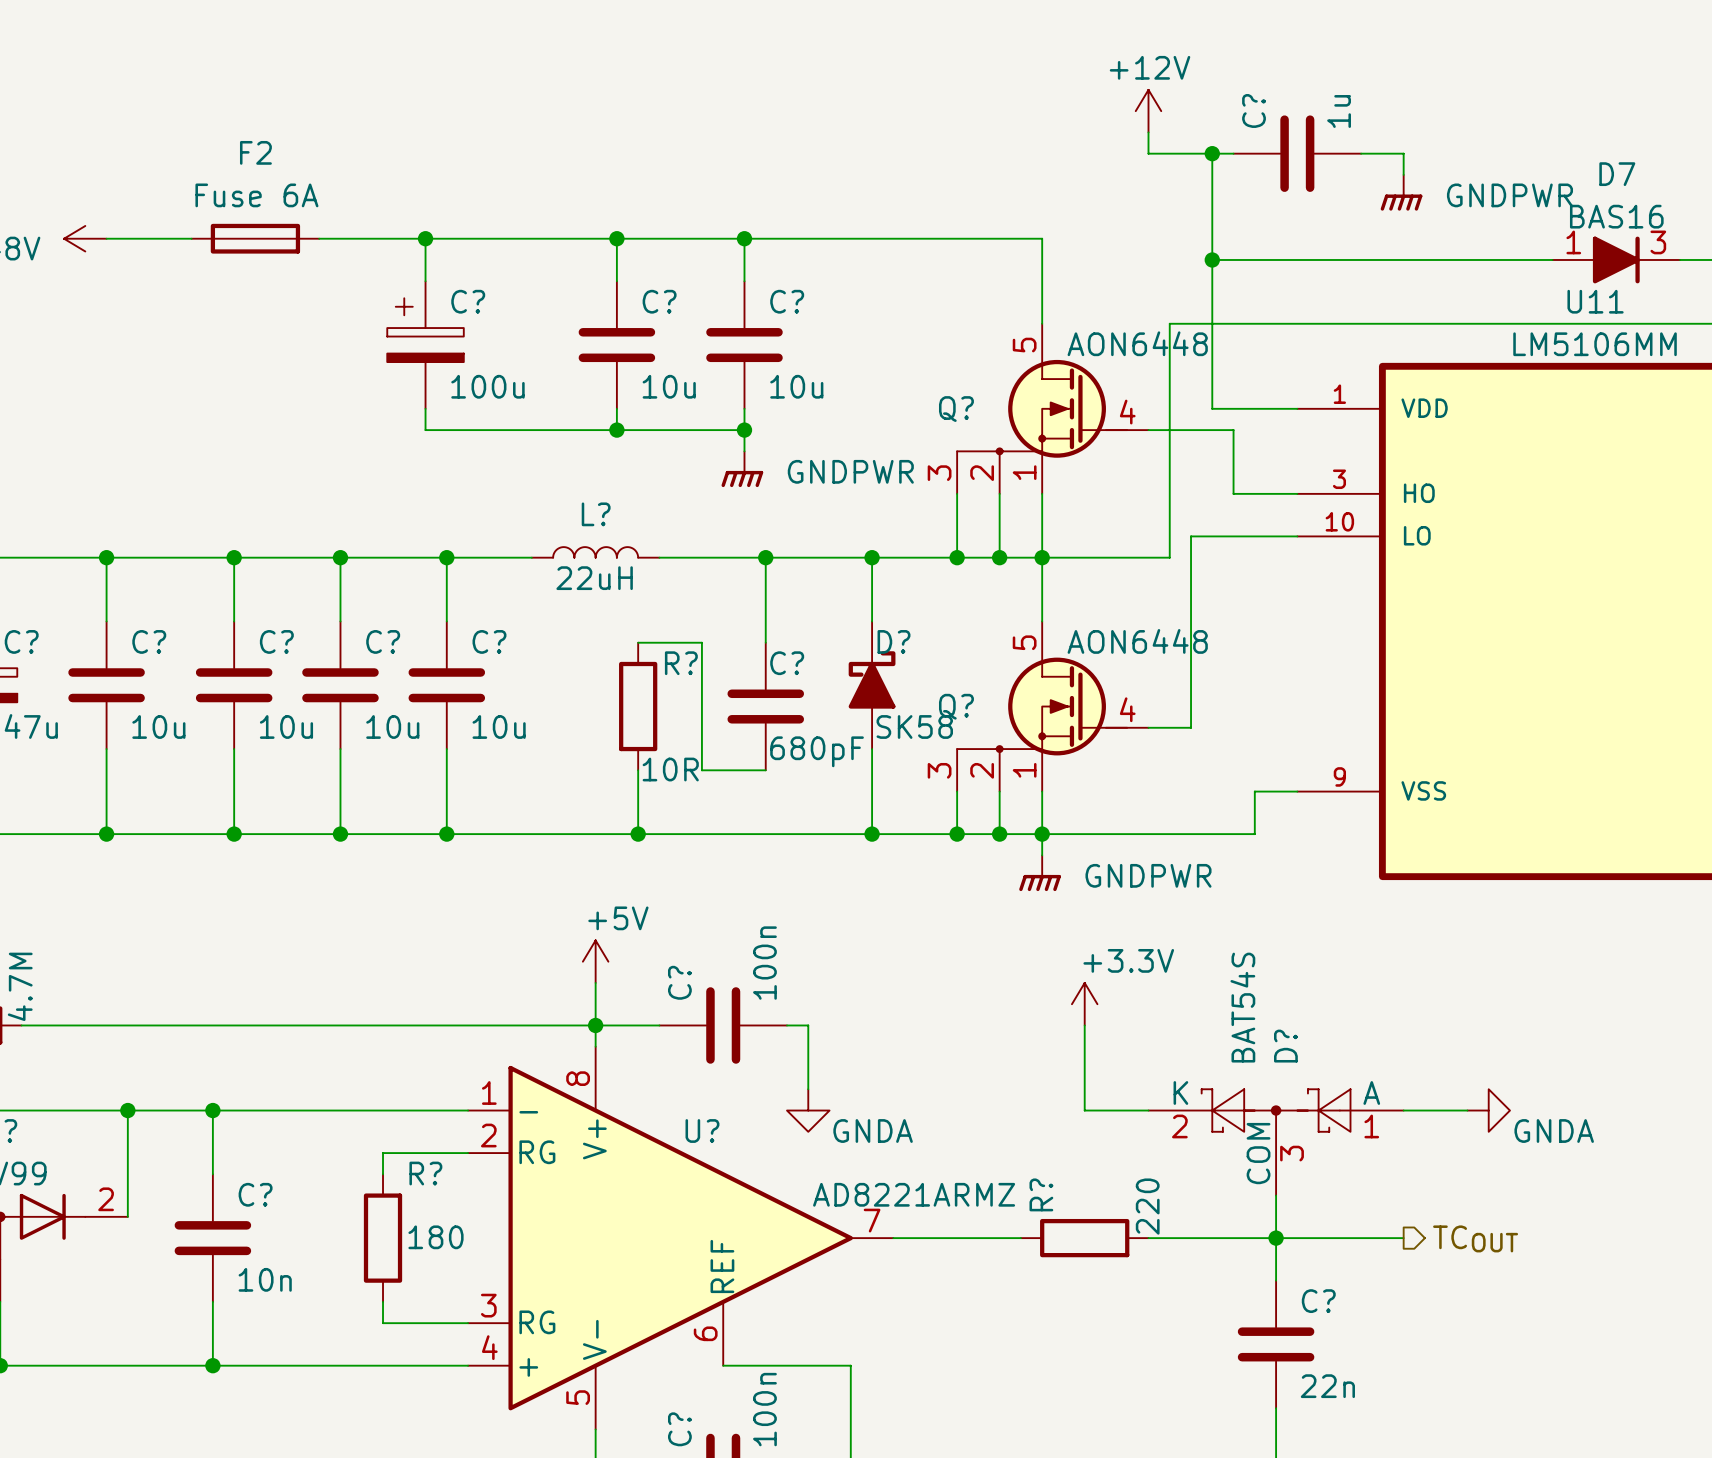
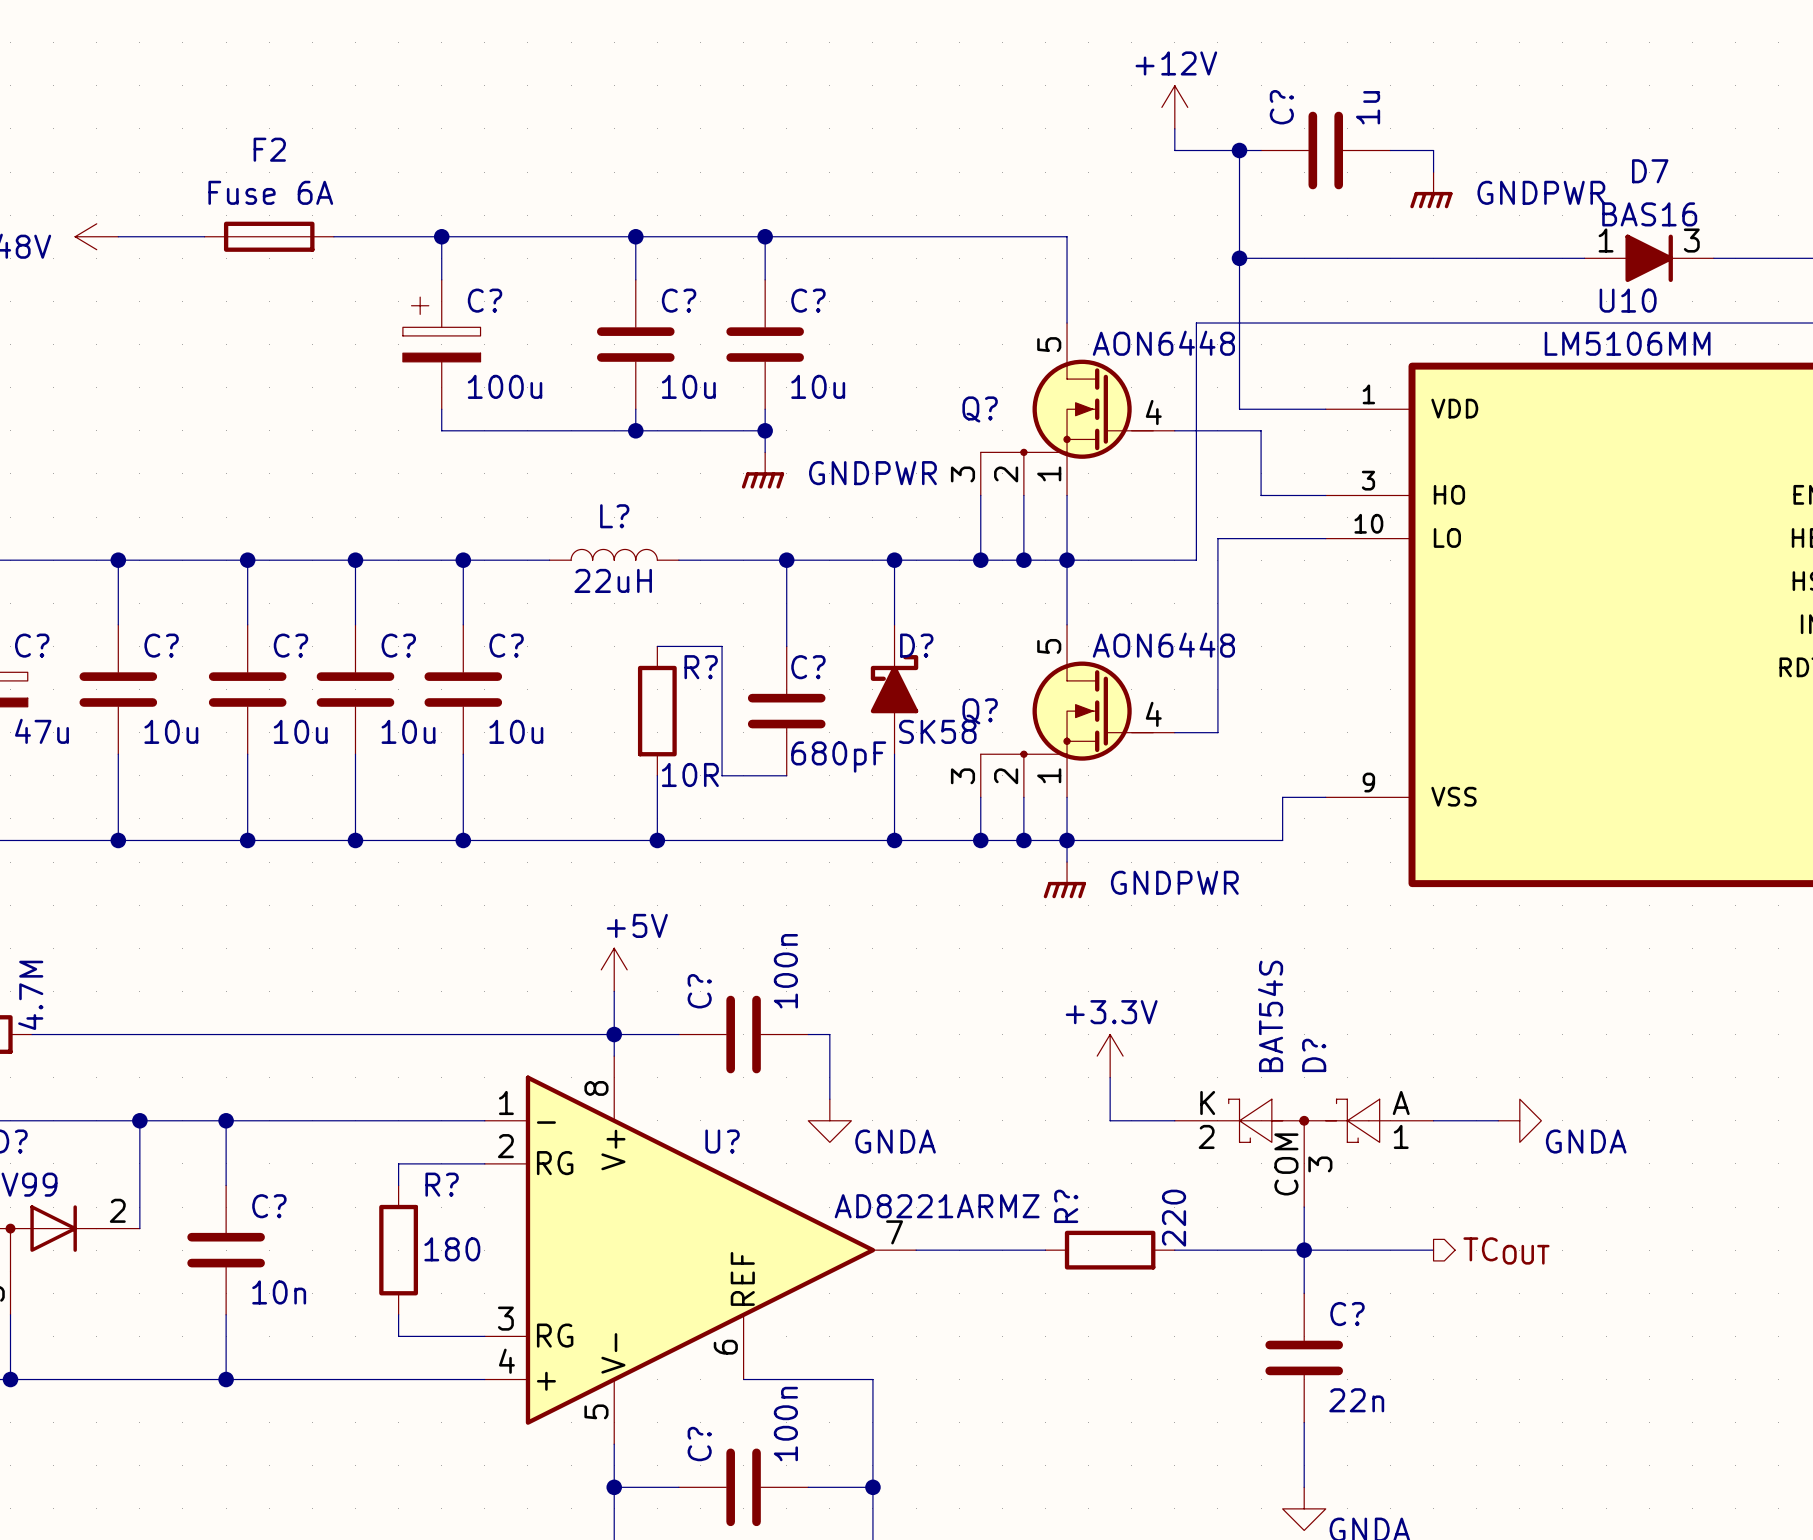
U11 name: U11 (1595, 301) -> U10 (1628, 300)
power symbol text position: +3.3V (1128, 960) -> +3.3V (1111, 1012)
power symbol position: +3.3V (1084, 1004) -> +3.3V (1110, 1056)

